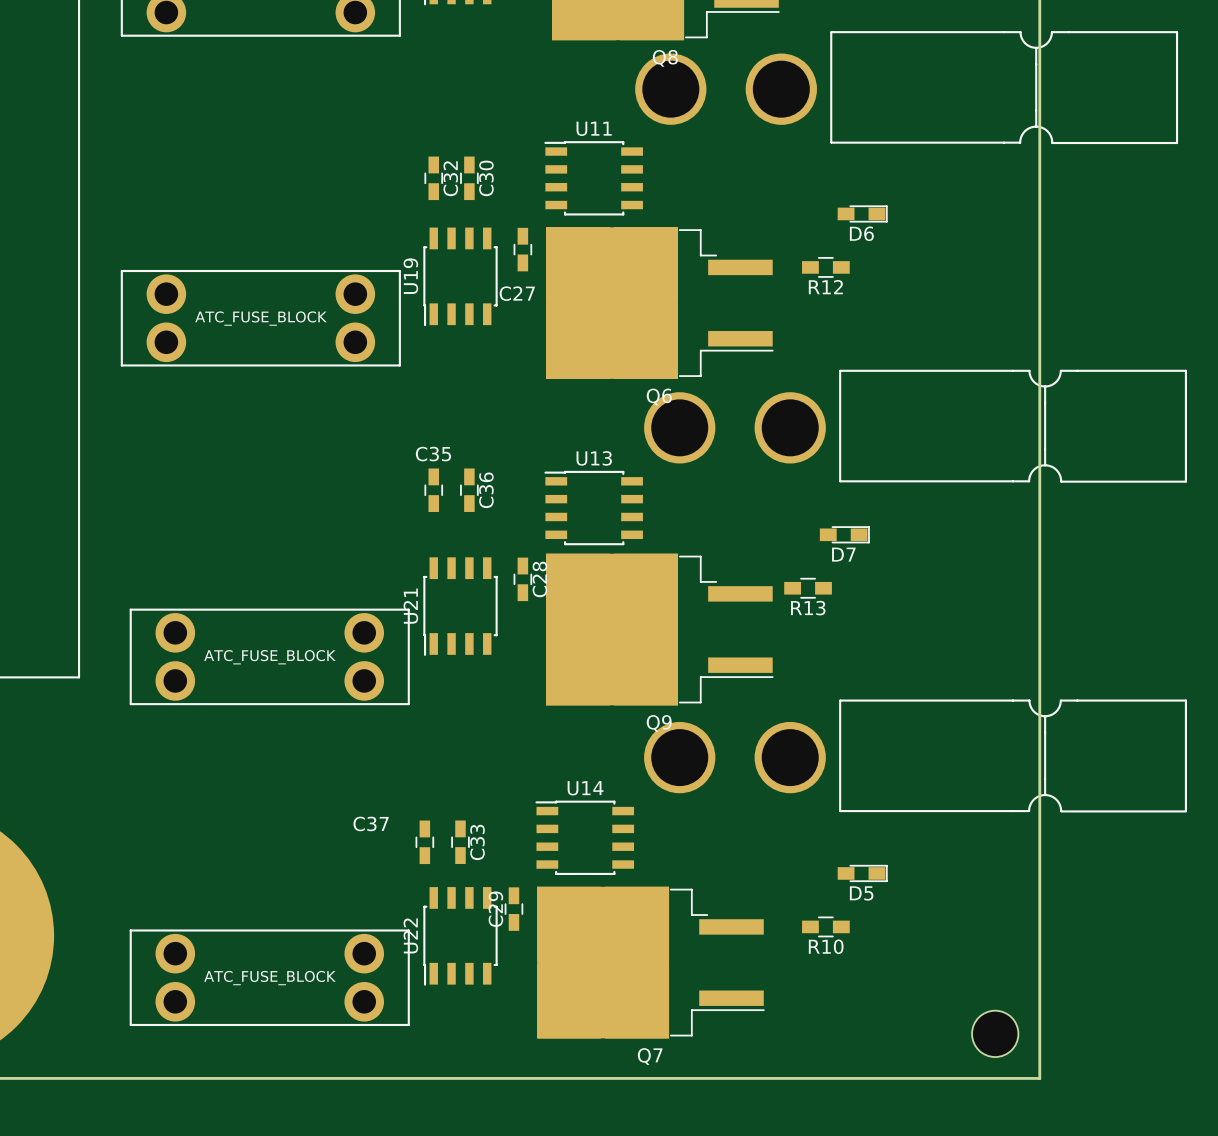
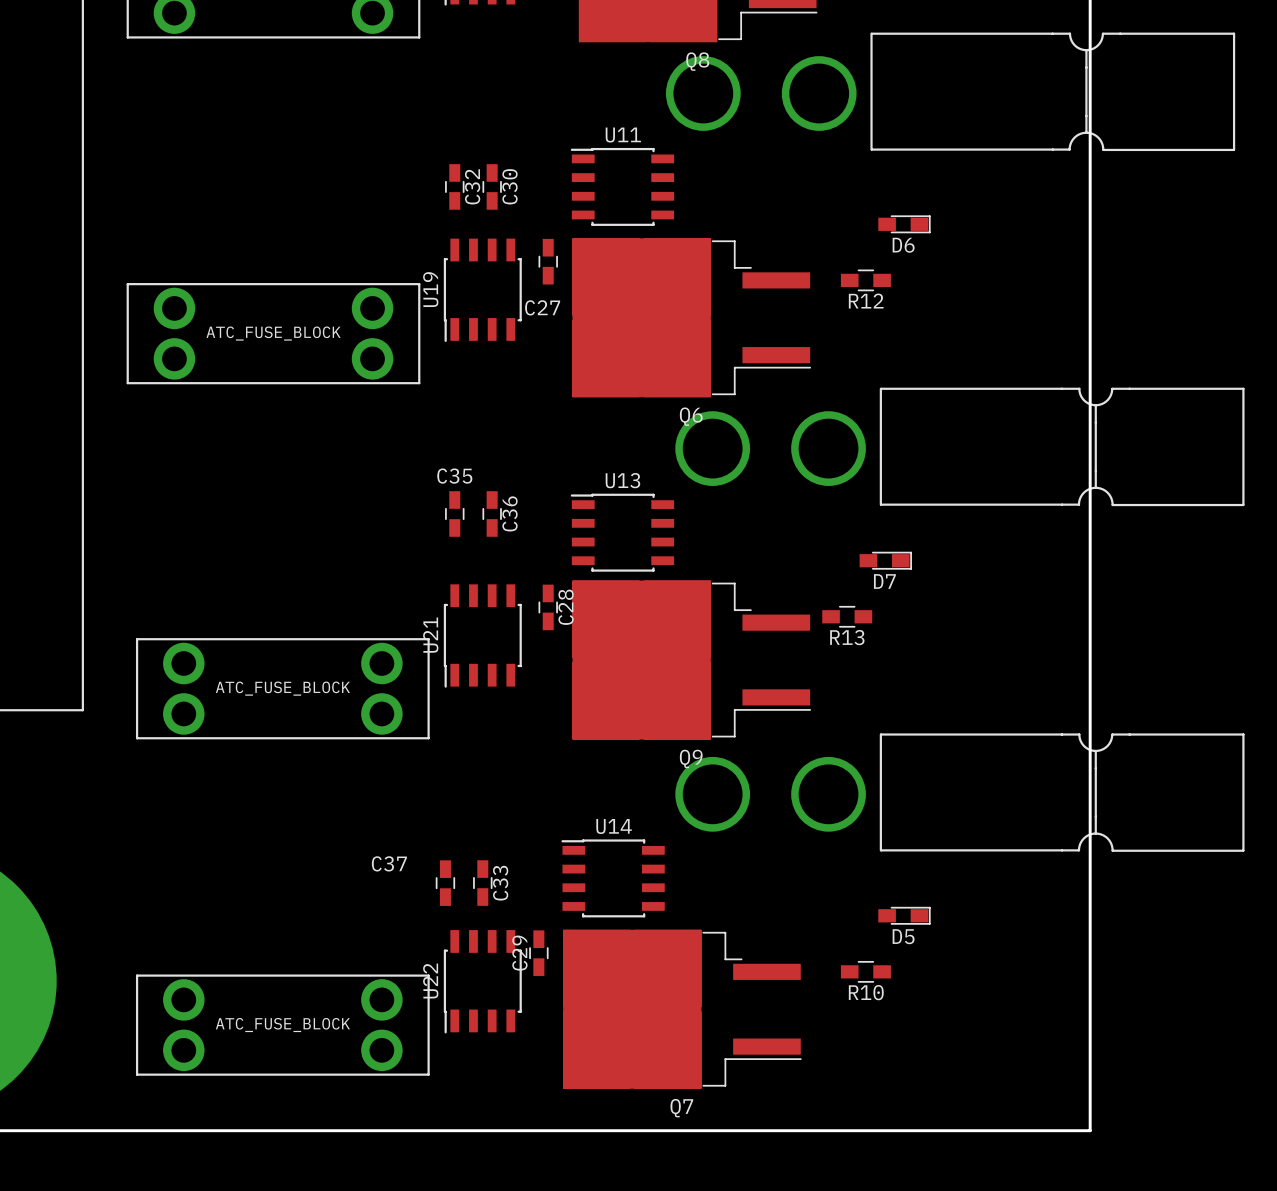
part: (995, 1033) -> none

